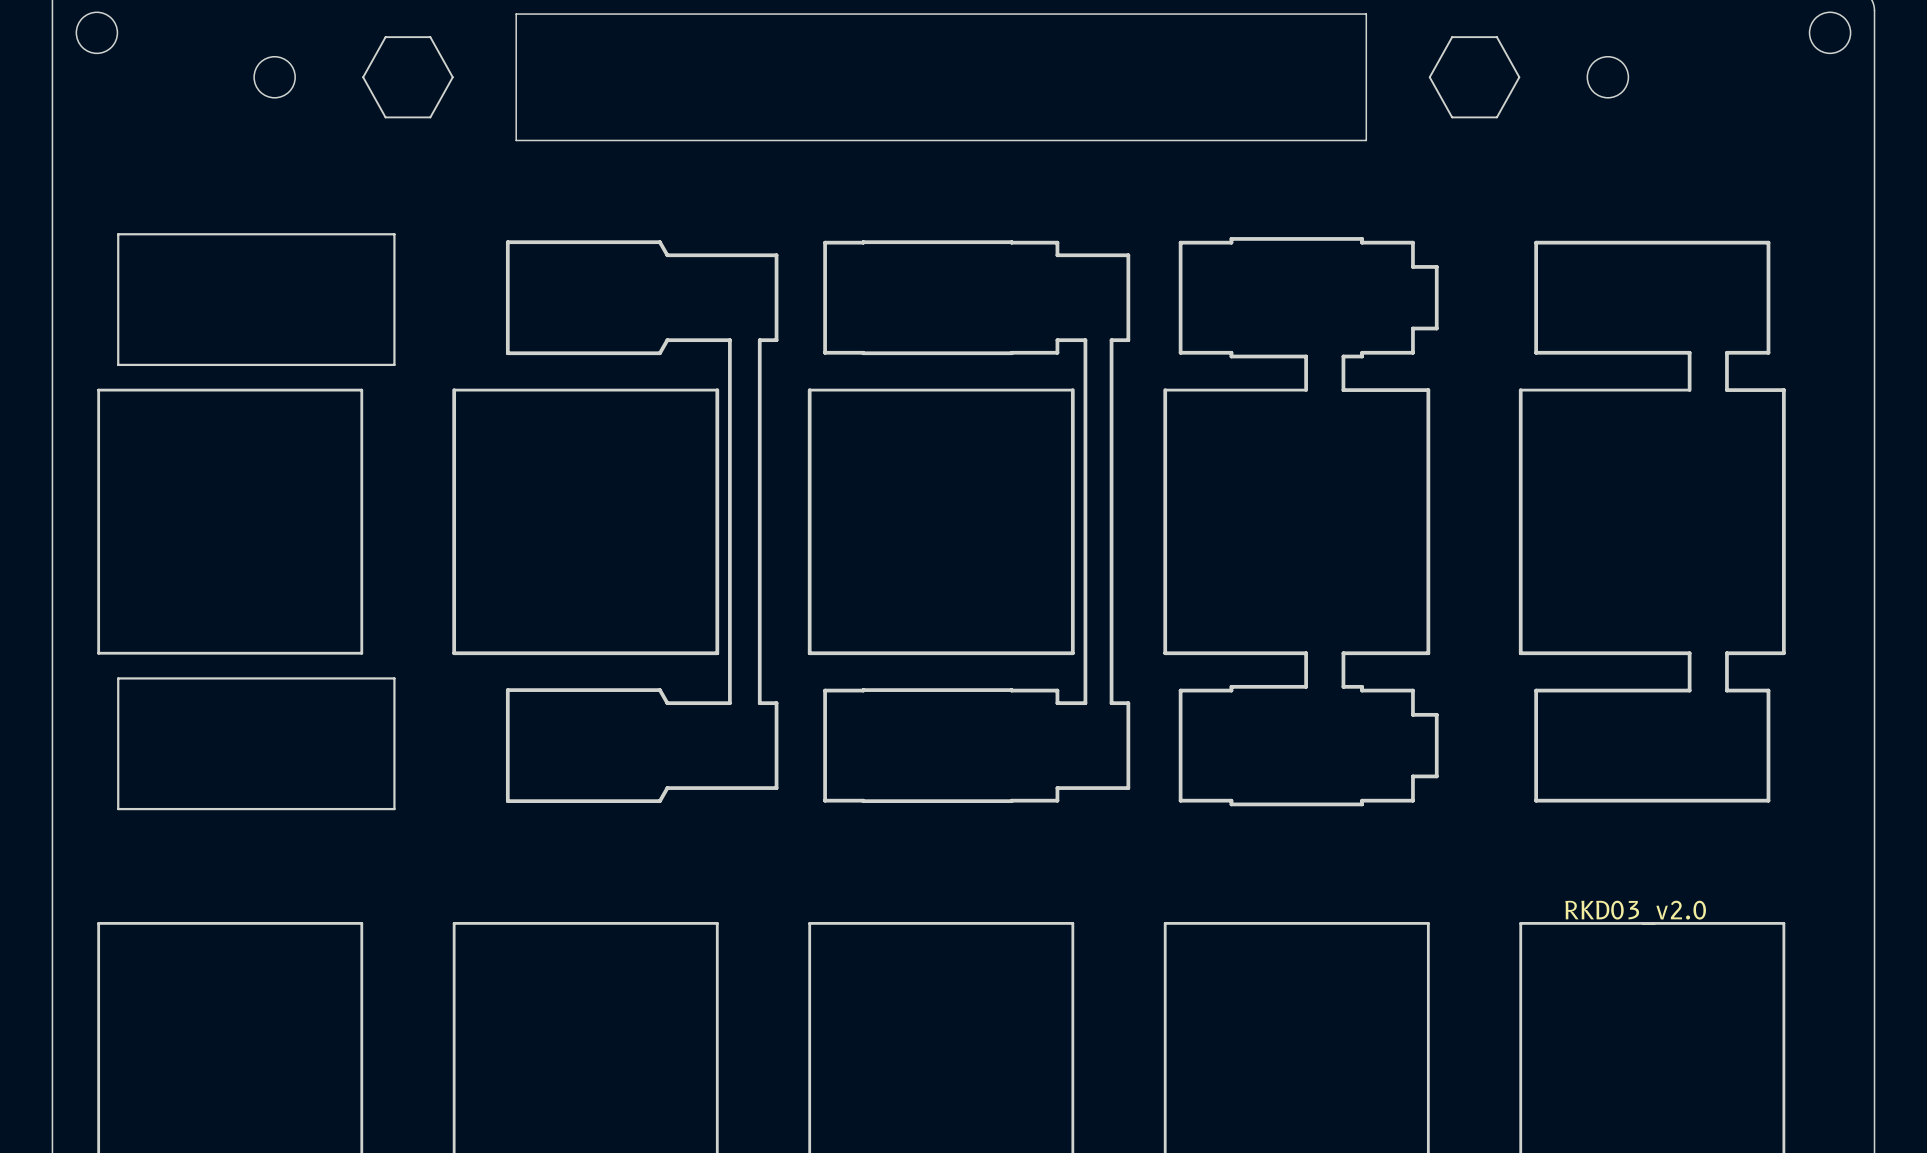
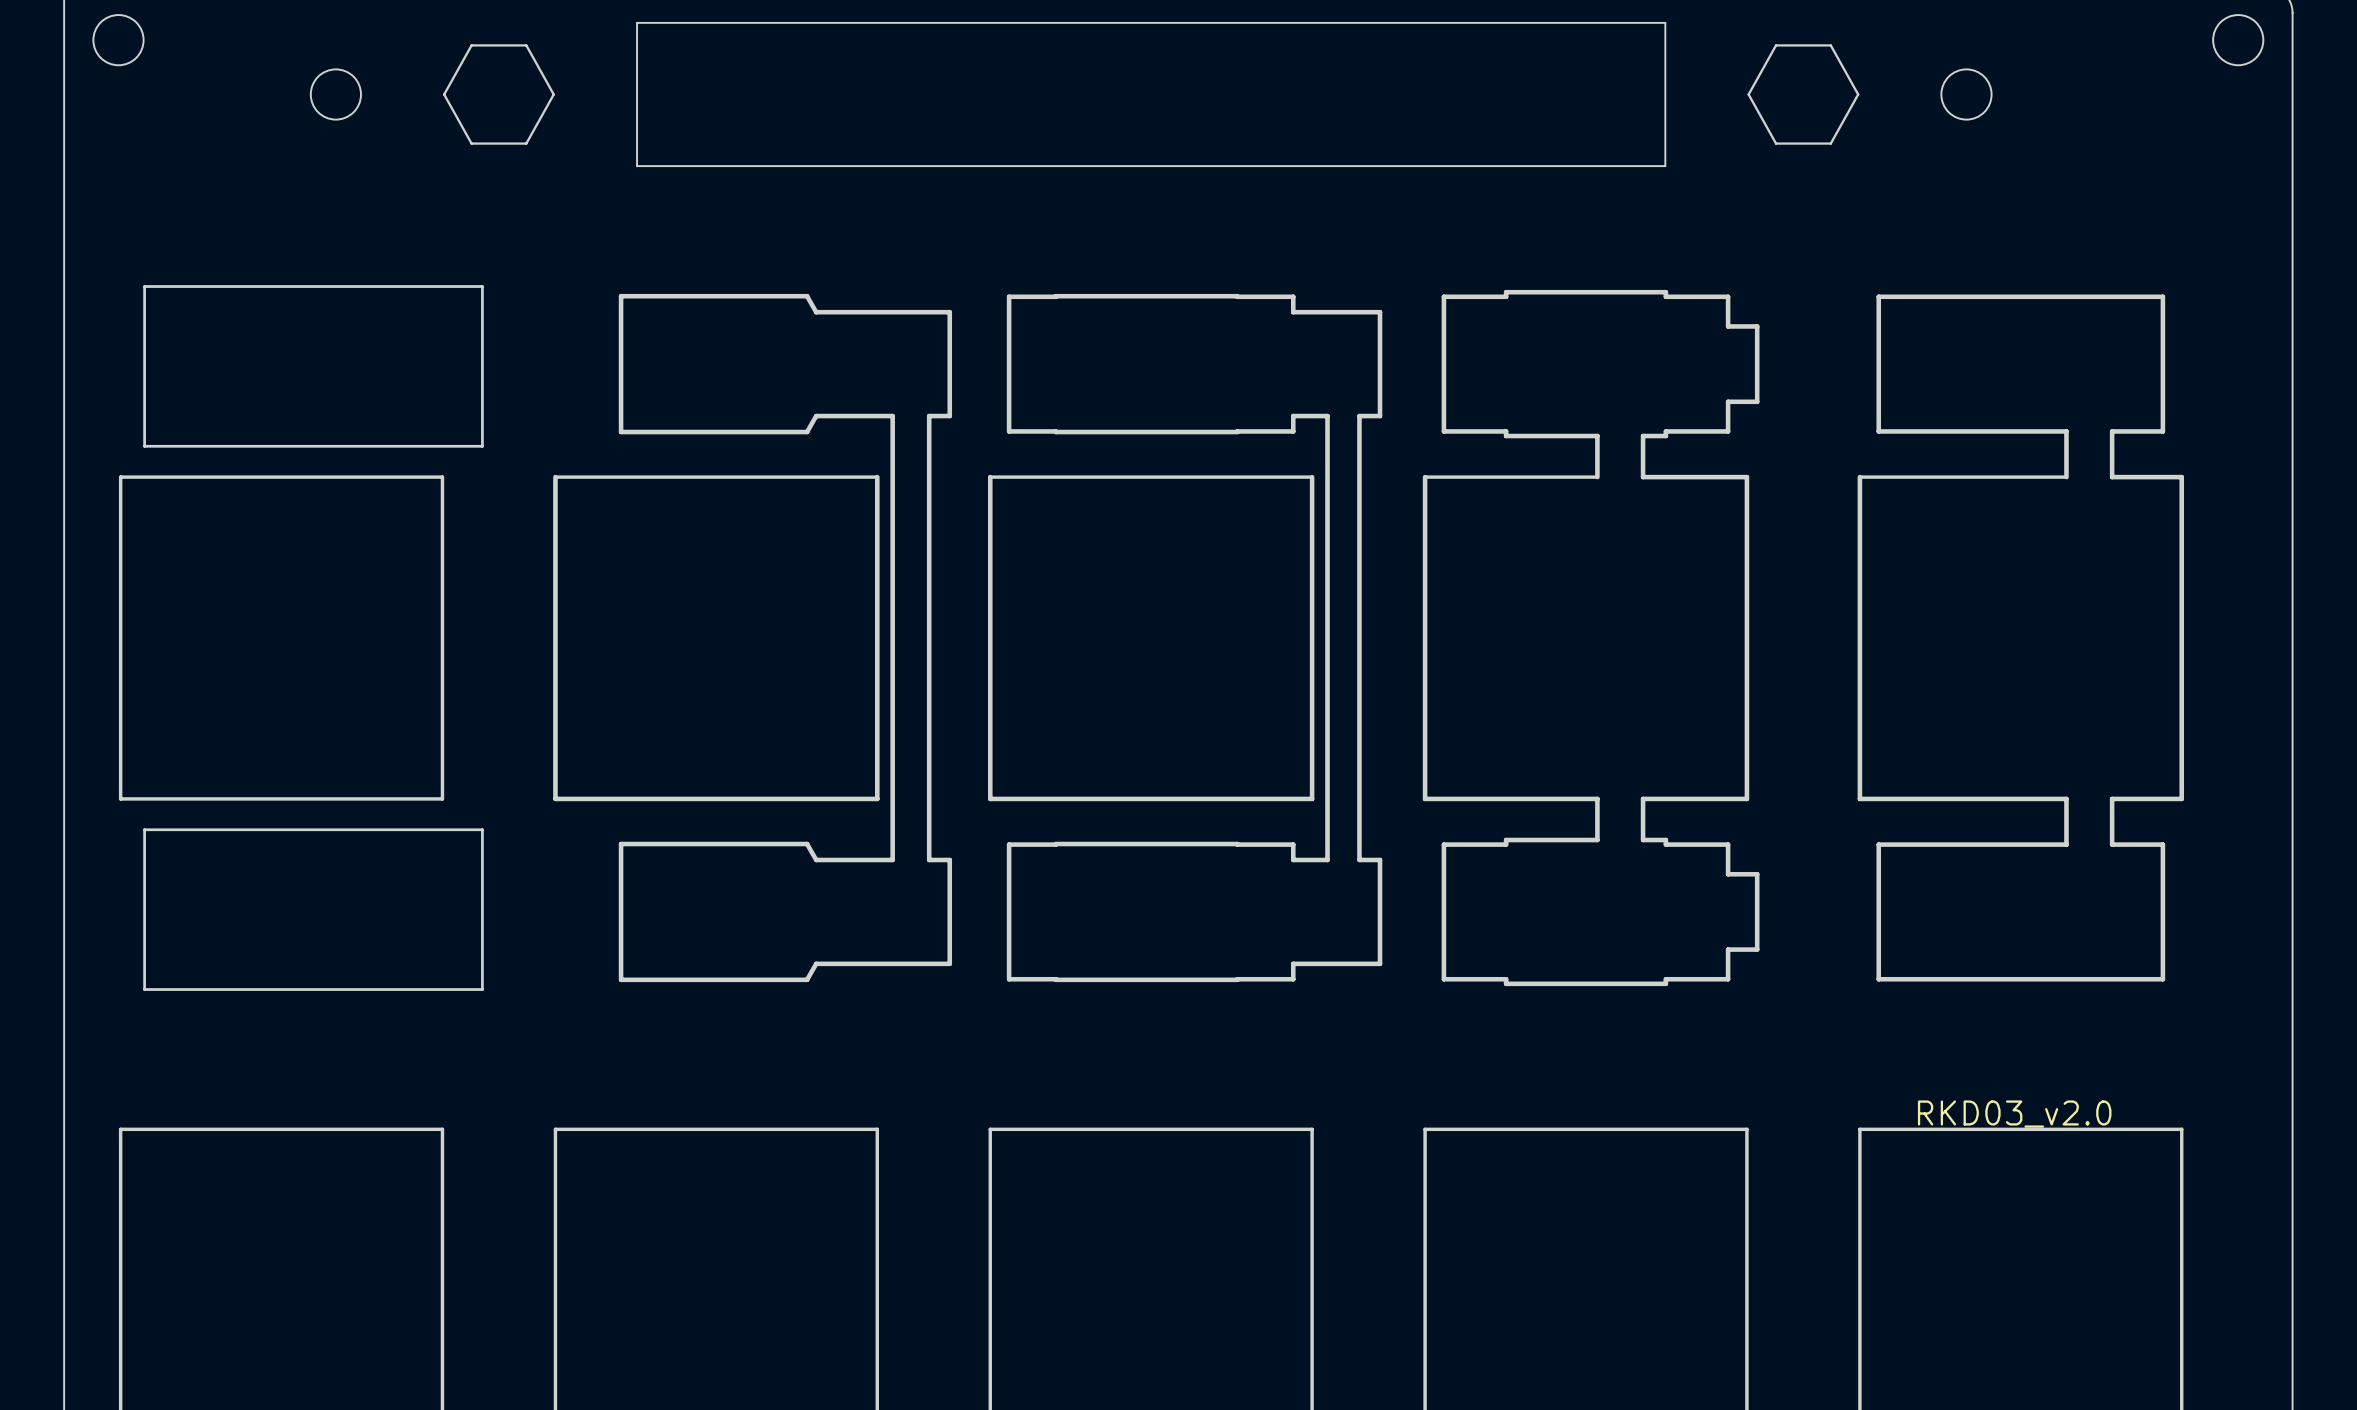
drawing shape: [515, 13, 1367, 141] -> [636, 22, 1666, 167]

